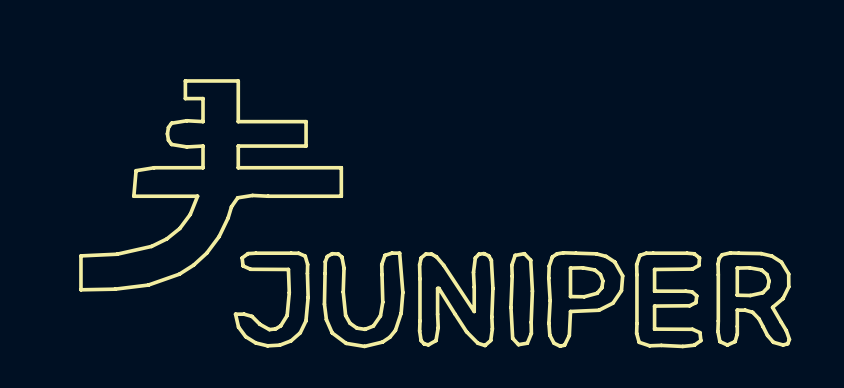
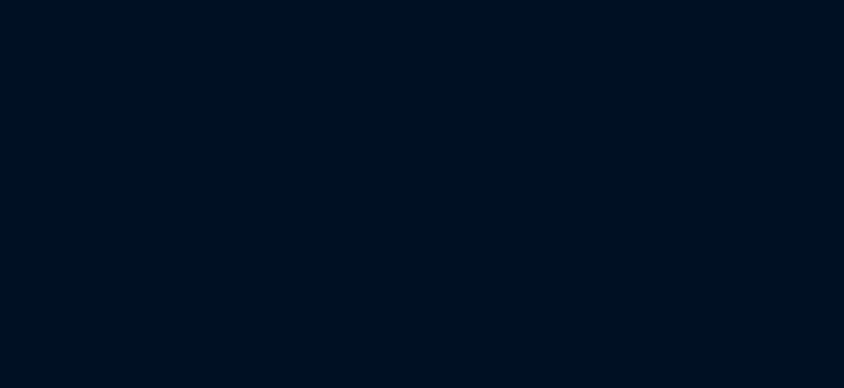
line: (185, 80) (185, 98) (203, 98) (203, 121) (186, 120) (171, 123) (168, 127) (168, 140) (171, 144) (186, 146) (203, 146) (203, 167) (154, 167) (136, 170) (133, 196) (197, 196) (190, 214) (179, 228) (166, 238) (151, 246) (117, 254) (80, 255) (80, 289) (115, 289) (148, 285) (179, 274) (193, 265) (206, 253) (219, 236) (231, 206) (237, 197) (252, 195) (341, 196) (341, 167) (238, 167) (238, 146) (306, 146) (306, 121) (238, 121) (238, 80) (185, 80) -> none
line: (563, 252) (552, 257) (549, 266) (548, 278) (549, 335) (553, 343) (560, 346) (564, 345) (569, 335) (570, 311) (598, 310) (612, 303) (621, 290) (622, 275) (614, 262) (606, 256) (596, 253) (563, 252) -> none
line: (730, 252) (722, 254) (718, 264) (717, 331) (719, 341) (727, 345) (735, 341) (737, 334) (737, 310) (745, 310) (752, 312) (758, 318) (773, 342) (783, 345) (787, 343) (789, 339) (786, 330) (772, 307) (782, 298) (788, 286) (788, 274) (781, 262) (772, 256) (761, 253) (730, 252) -> none
line: (255, 253) (248, 253) (242, 257) (243, 265) (250, 269) (288, 269) (287, 315) (280, 325) (269, 329) (259, 324) (252, 316) (235, 314) (238, 327) (245, 336) (255, 342) (267, 345) (279, 345) (291, 340) (300, 332) (305, 320) (307, 264) (305, 256) (298, 253) (255, 253) -> none
line: (392, 253) (384, 255) (381, 264) (382, 302) (380, 315) (373, 326) (365, 329) (356, 328) (350, 323) (345, 315) (341, 257) (338, 254) (332, 253) (327, 256) (325, 261) (324, 304) (326, 319) (332, 332) (346, 343) (364, 346) (382, 342) (395, 330) (401, 313) (402, 292) (399, 253) (392, 253) -> none
line: (483, 253) (478, 254) (475, 257) (473, 272) (474, 311) (436, 256) (425, 254) (421, 257) (419, 330) (421, 340) (424, 343) (428, 344) (436, 340) (438, 327) (437, 288) (466, 331) (477, 343) (485, 345) (490, 340) (492, 288) (491, 260) (488, 255) (483, 253) -> none
line: (524, 253) (530, 260) (531, 333) (527, 343) (518, 344) (512, 338) (511, 265) (515, 255) (524, 253) -> none
line: (653, 253) (639, 255) (636, 264) (636, 333) (639, 342) (649, 345) (694, 345) (700, 340) (699, 332) (692, 329) (654, 329) (654, 306) (689, 305) (695, 302) (696, 295) (692, 291) (685, 291) (654, 291) (654, 269) (692, 269) (698, 265) (699, 257) (694, 253) (653, 253) -> none
line: (582, 267) (594, 269) (600, 274) (602, 280) (601, 287) (597, 293) (584, 296) (570, 296) (570, 268) (582, 267) -> none
line: (749, 267) (761, 269) (767, 274) (769, 281) (767, 287) (762, 292) (750, 295) (737, 295) (737, 268) (749, 267) -> none

